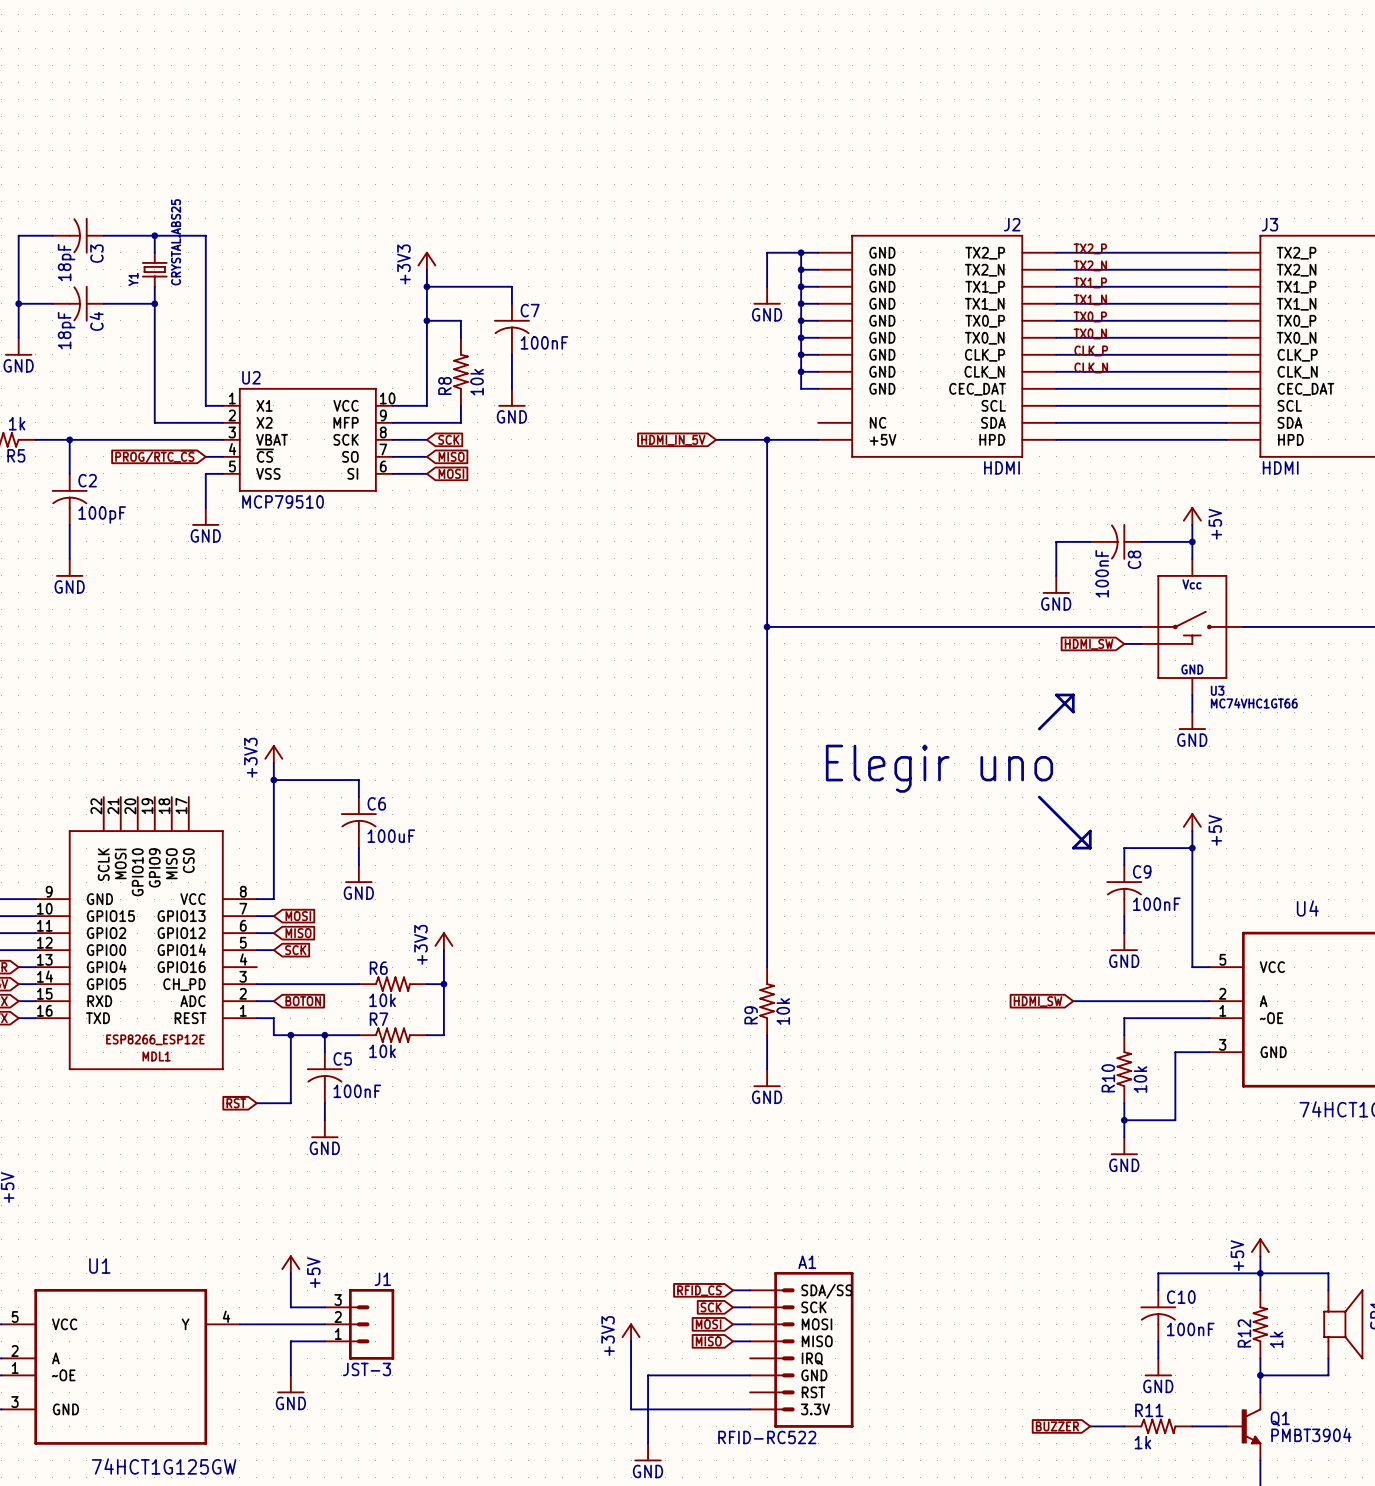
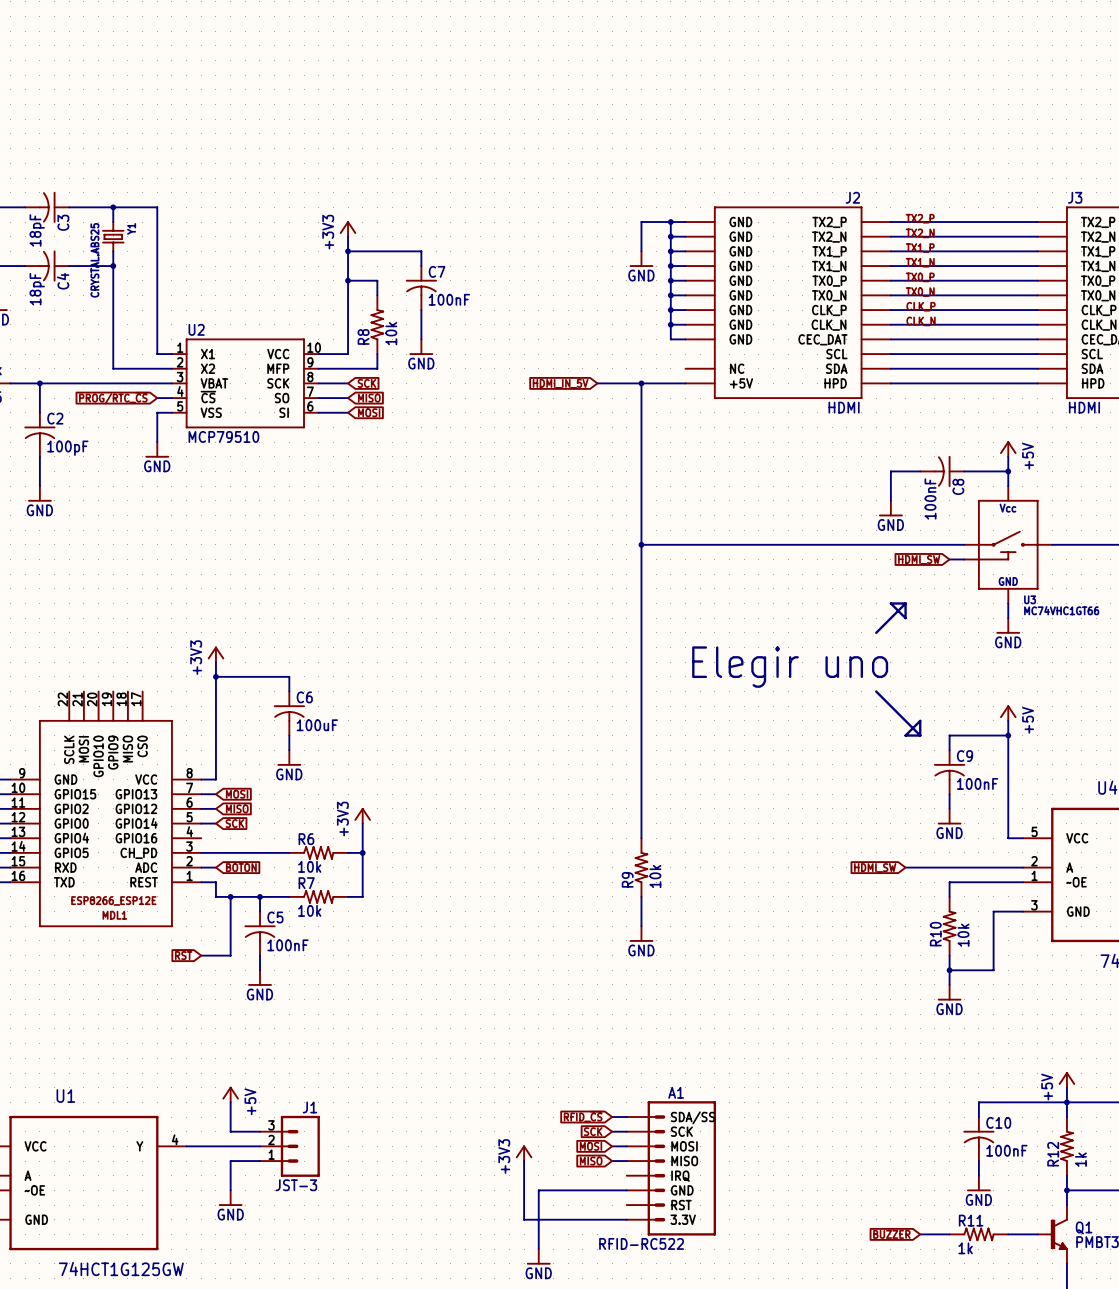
Y1 rotation: 0° (154, 269) -> 180° (113, 236)

